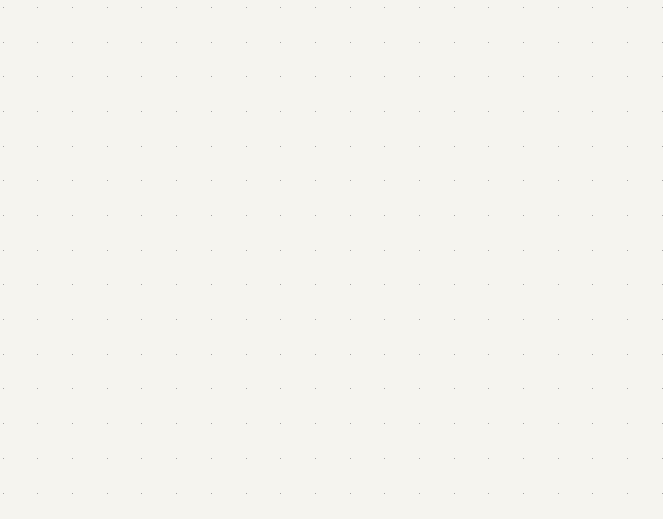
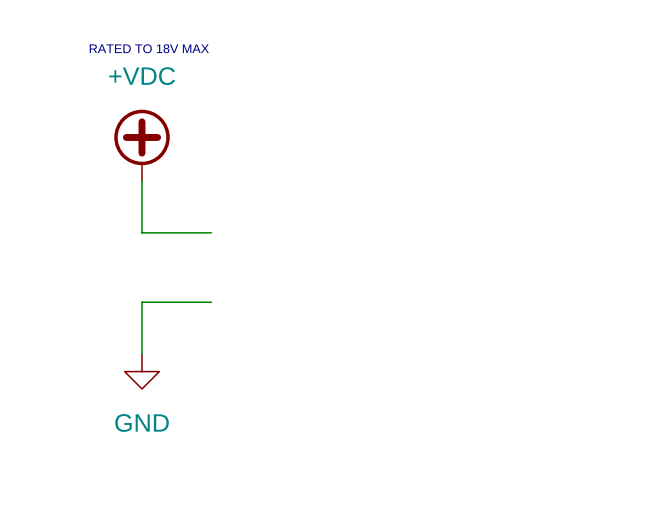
text: none -> RATED TO 18V MAX (149, 48)
power symbol: none -> +VDC (141, 145)
wire: none -> (141, 180) (141, 232) (211, 232)
wire: none -> (211, 302) (141, 302) (141, 354)
power symbol: none -> GND (141, 371)

